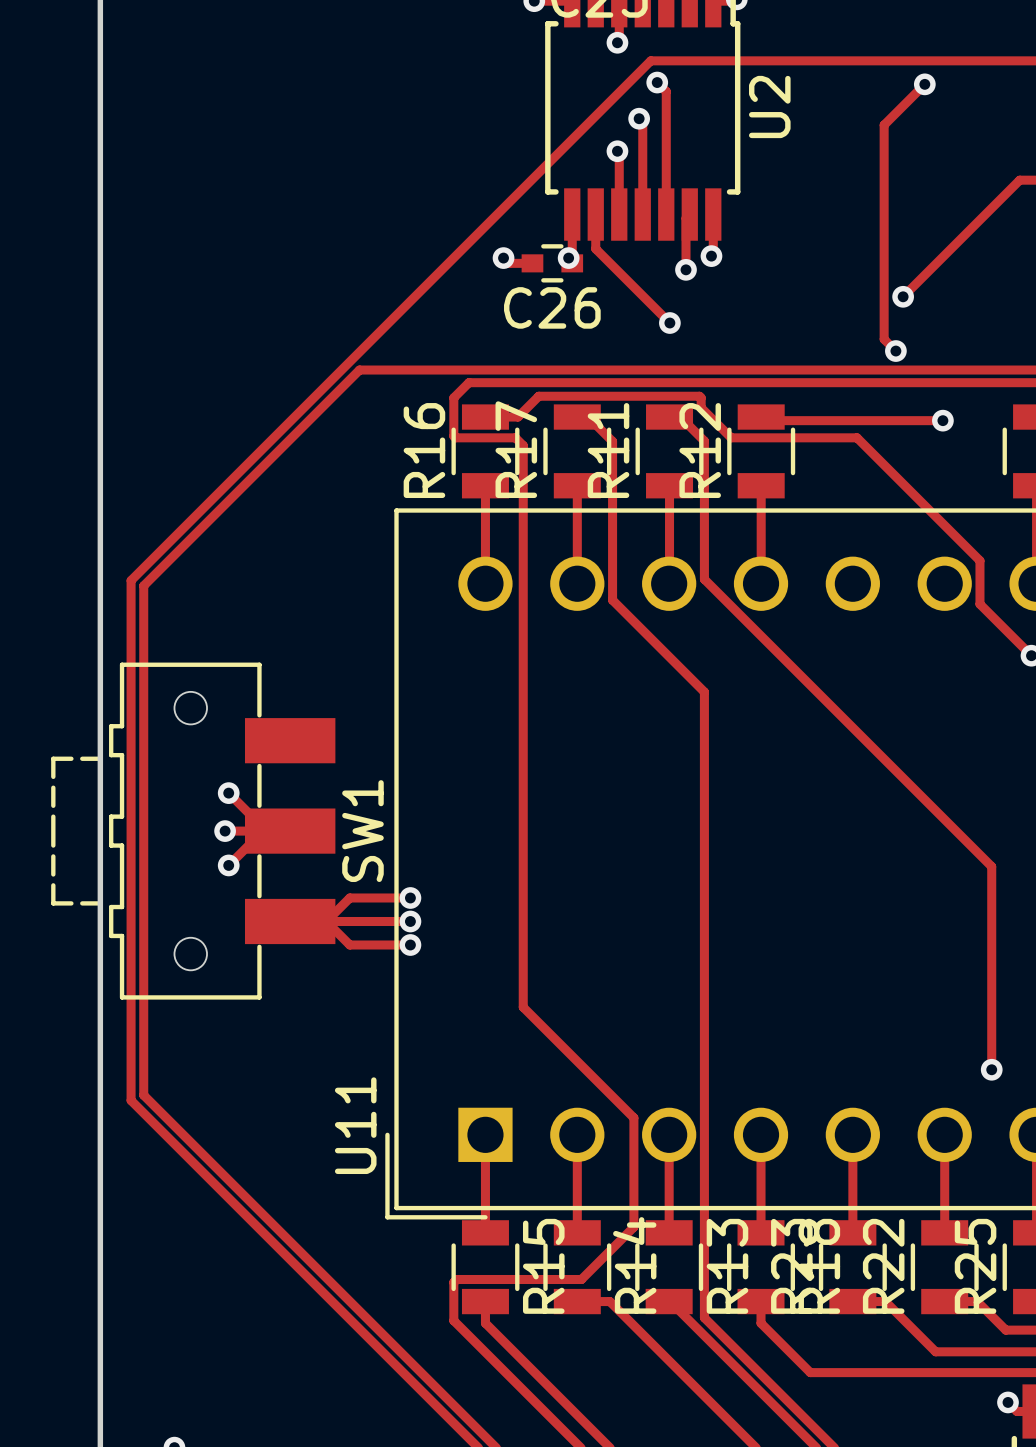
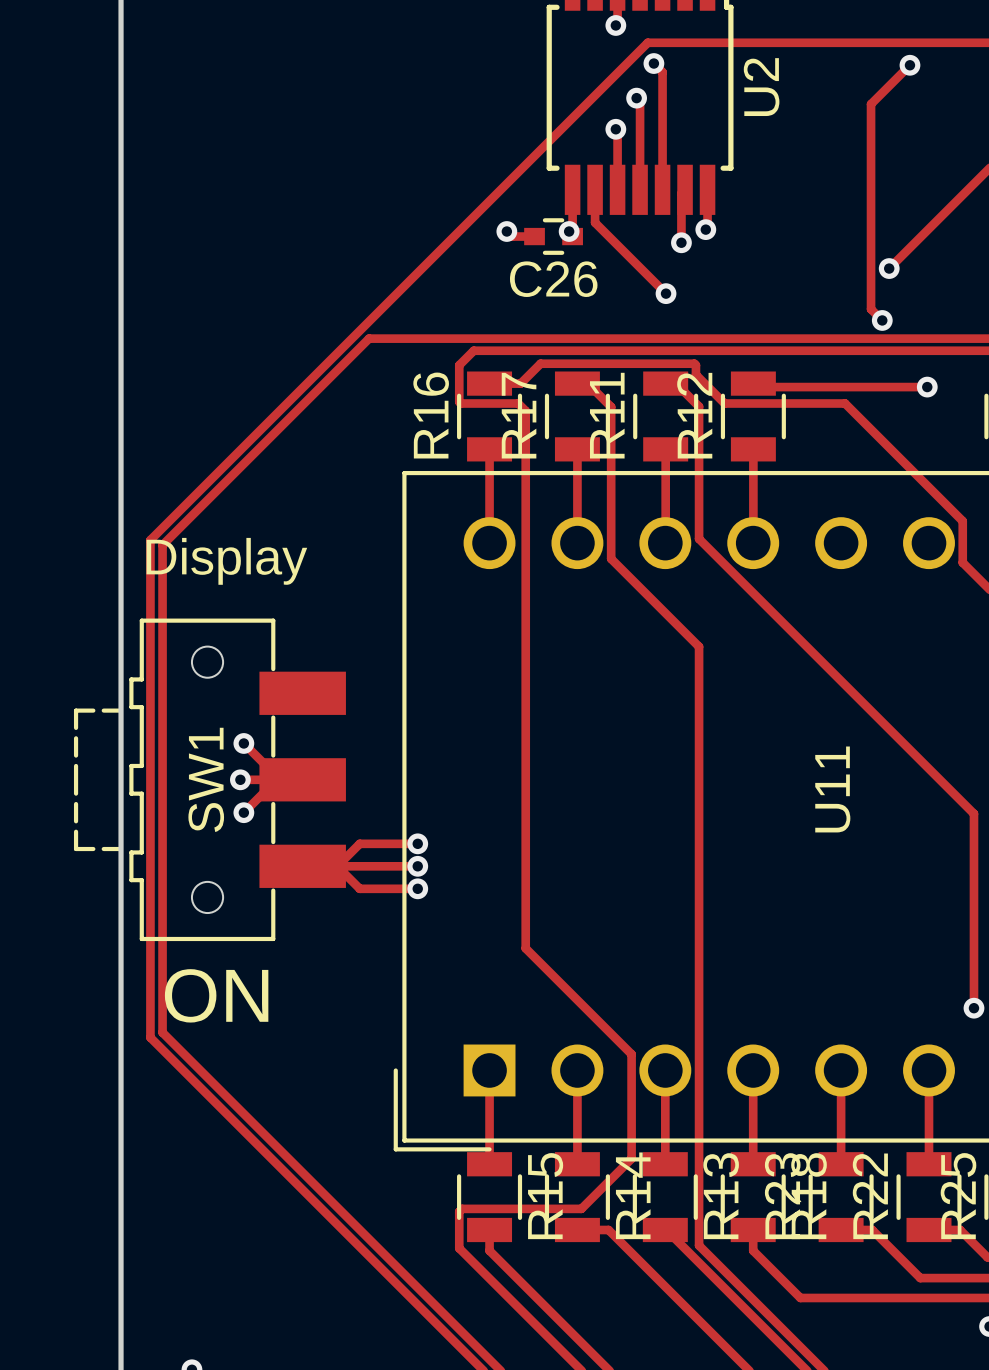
SW1 value: none -> Display (226, 561)
SW1 name position: SW1 (362, 831) -> SW1 (206, 779)
text: none -> ON (216, 995)
U11 name position: U11 (355, 1125) -> U11 (832, 789)

